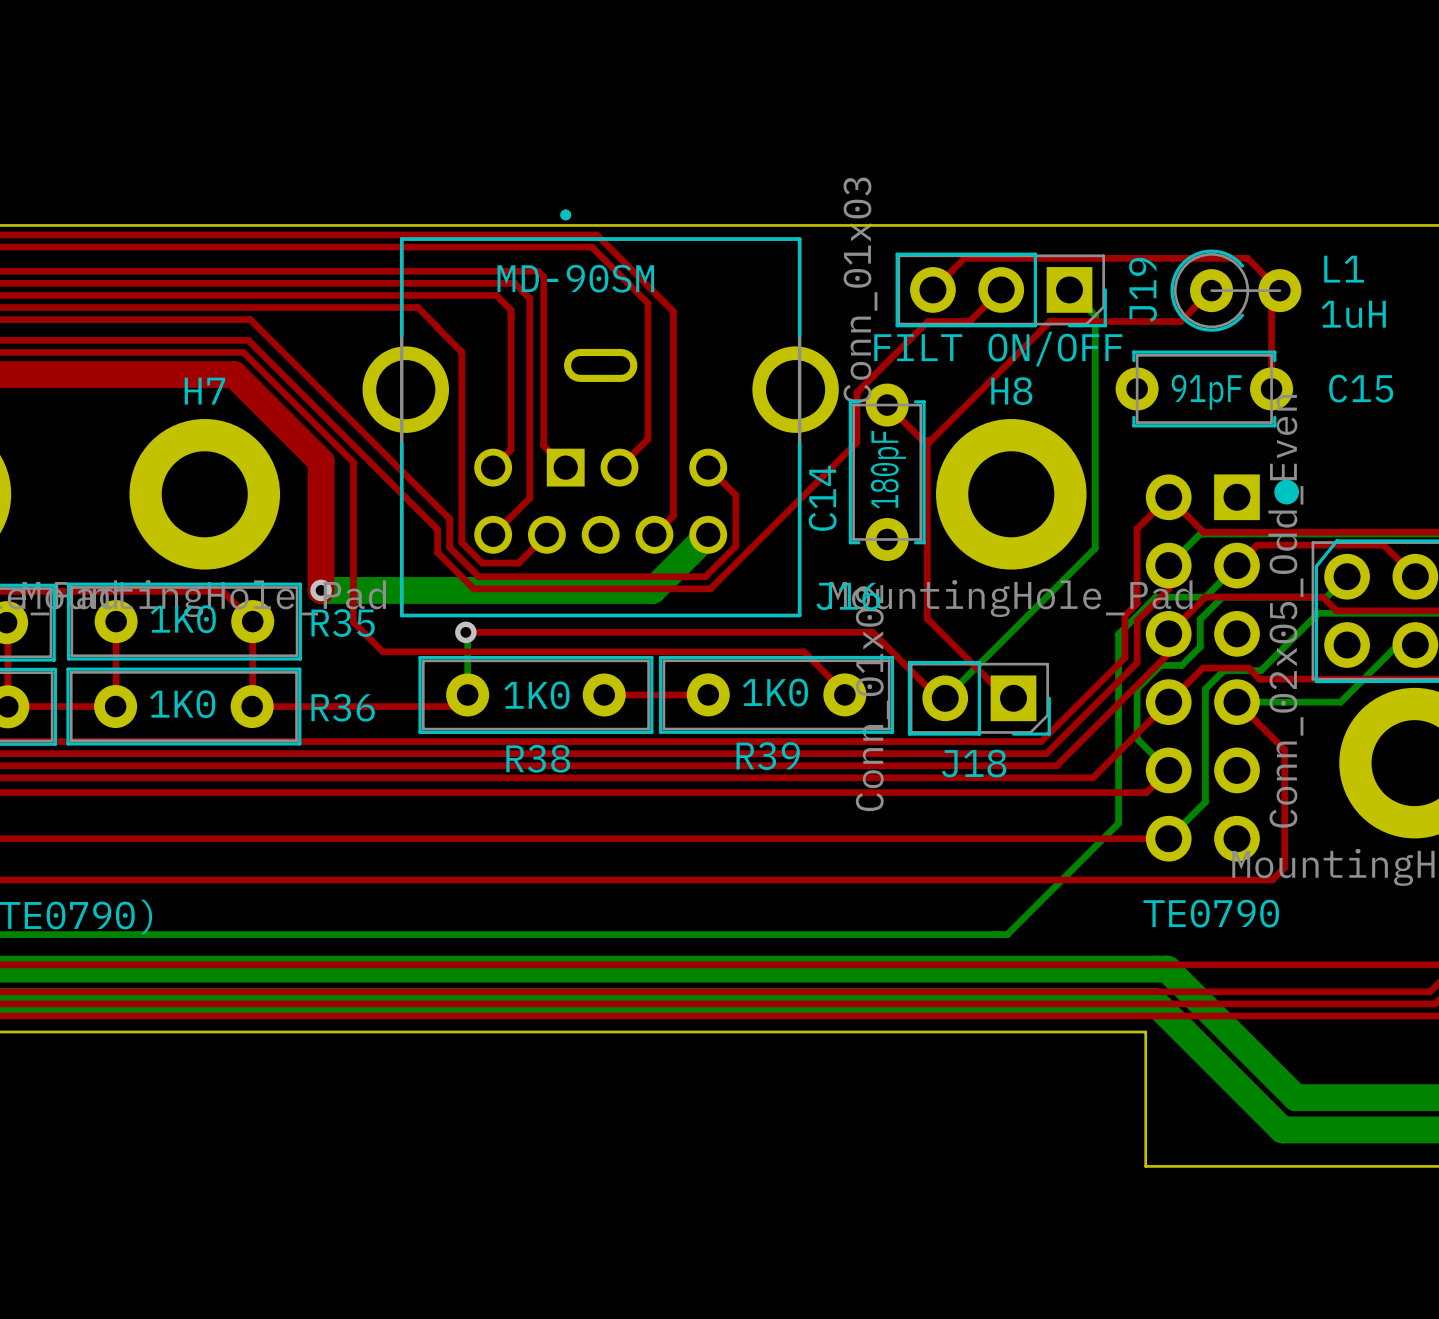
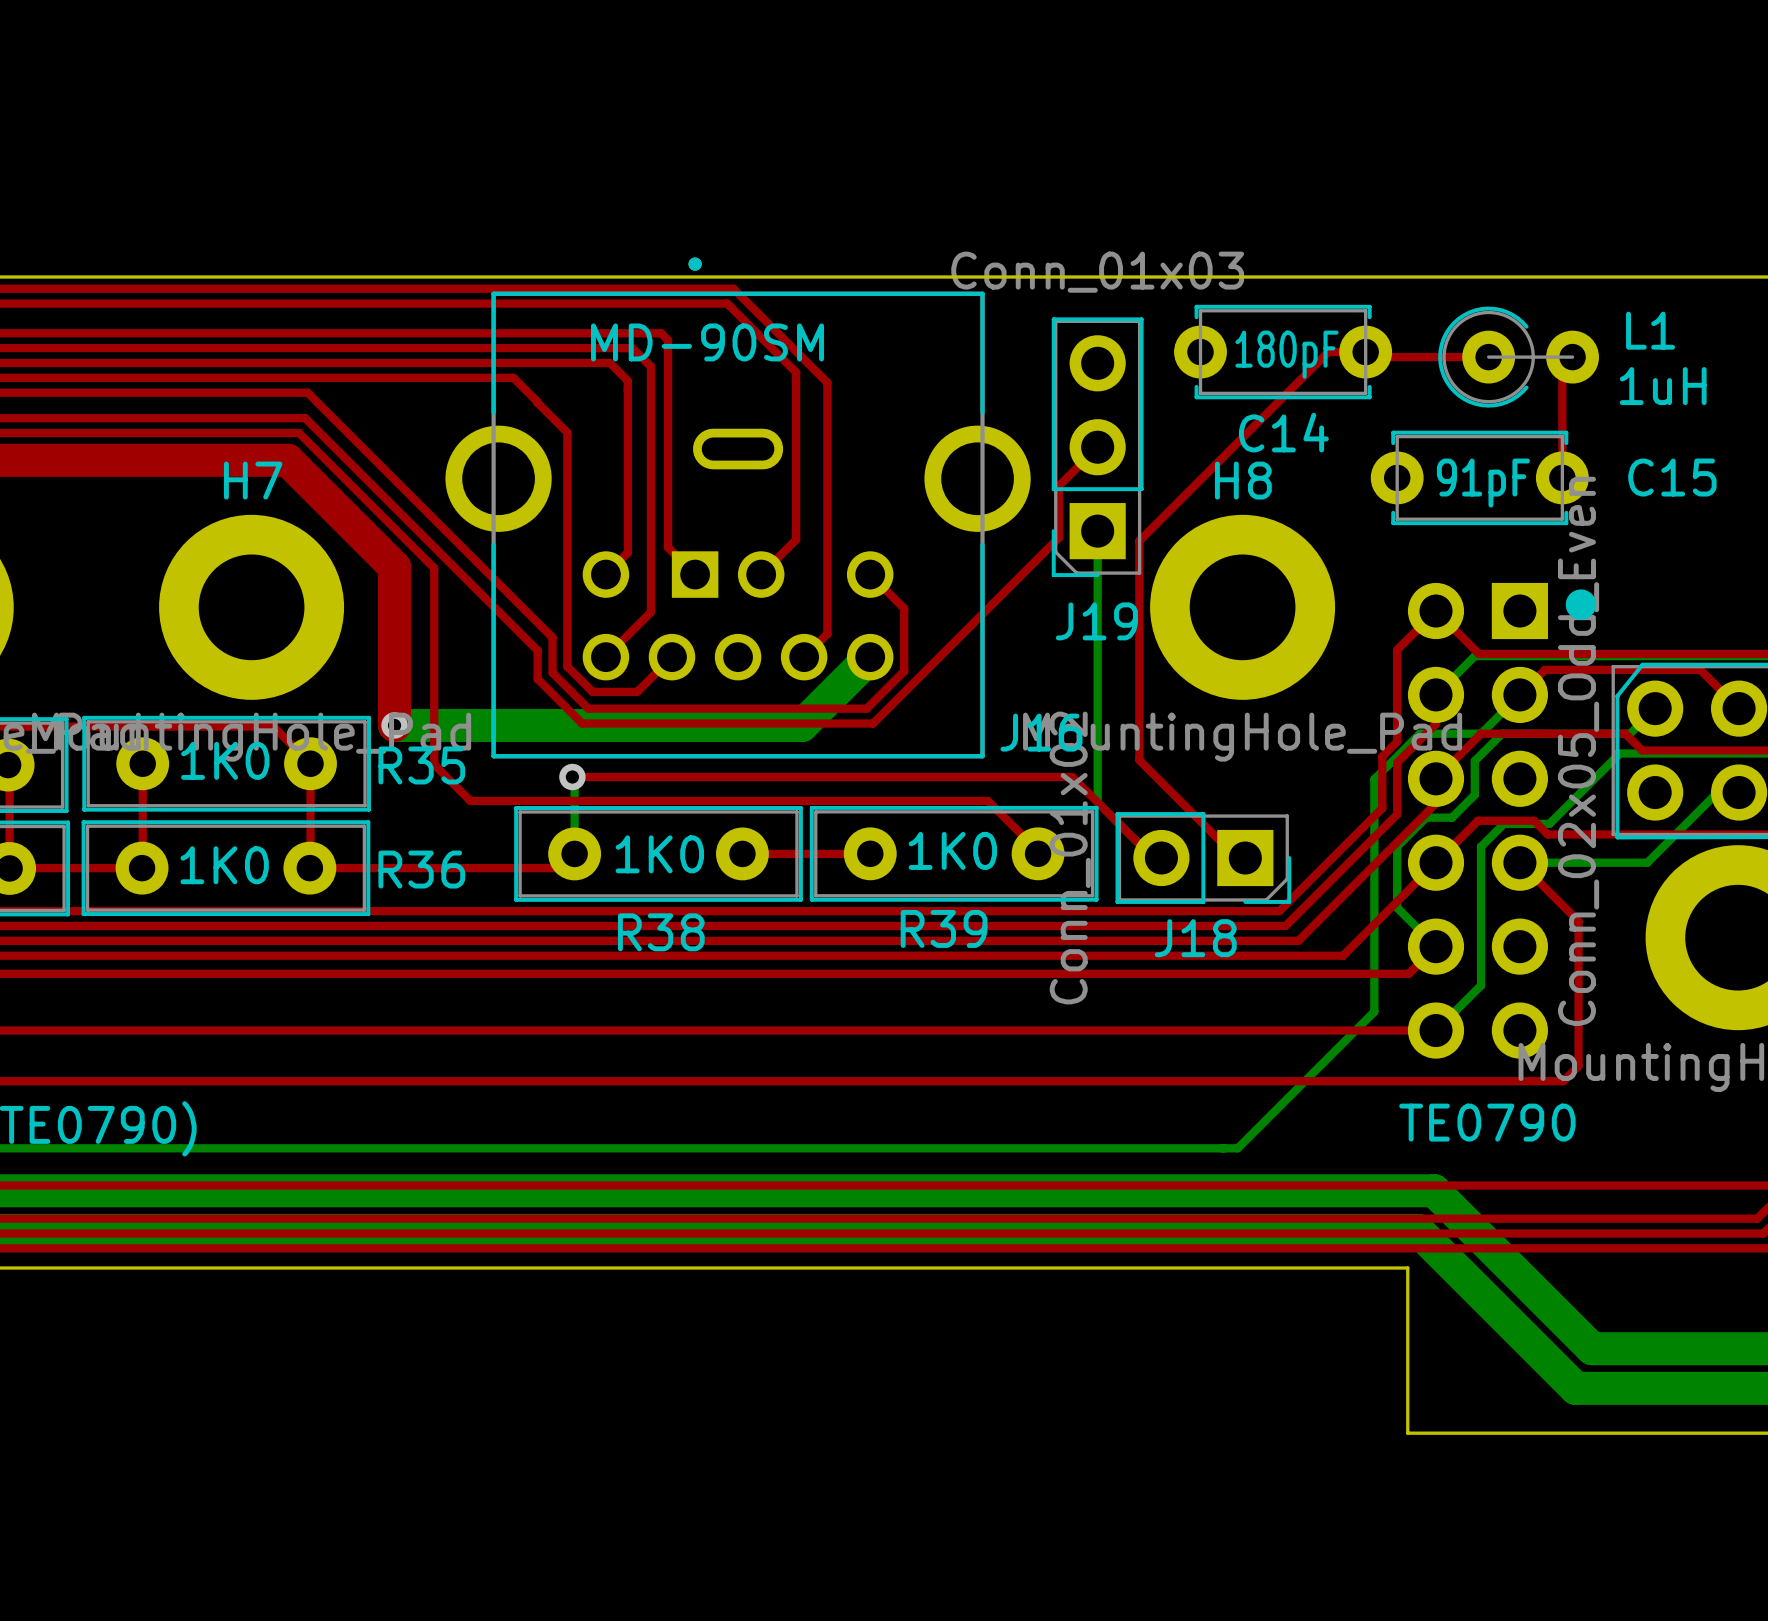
top track: (932, 289) (964, 258) (1247, 258) (1279, 290) -> none
top track: (1001, 289) (969, 321) (927, 321) (856, 392) (856, 442) -> (1097, 447) (1058, 486) (1058, 537) (1052, 543)
J19 rotation: 0° (1001, 289) -> 90° clockwise (1097, 447)
J19 position: (1001, 289) -> (1097, 447)
bottom track: (1069, 289) (1095, 315) (1095, 548) (945, 698) -> none
top track: (1211, 290) (1180, 321) (1050, 321) (927, 444) -> (1488, 357) (1370, 357) (1365, 352) (1328, 352) (1139, 541)
text: FILT ON/OFF (998, 349) -> none
top track: (887, 405) (922, 440) (927, 440) -> none
bottom track: none -> (1097, 531) (1097, 802) (1156, 861)
C14 rotation: 0° (887, 472) -> 90° clockwise (1283, 352)
C14 position: (887, 472) -> (1283, 352)
C14 name position: C14 (822, 498) -> C14 (1283, 432)

